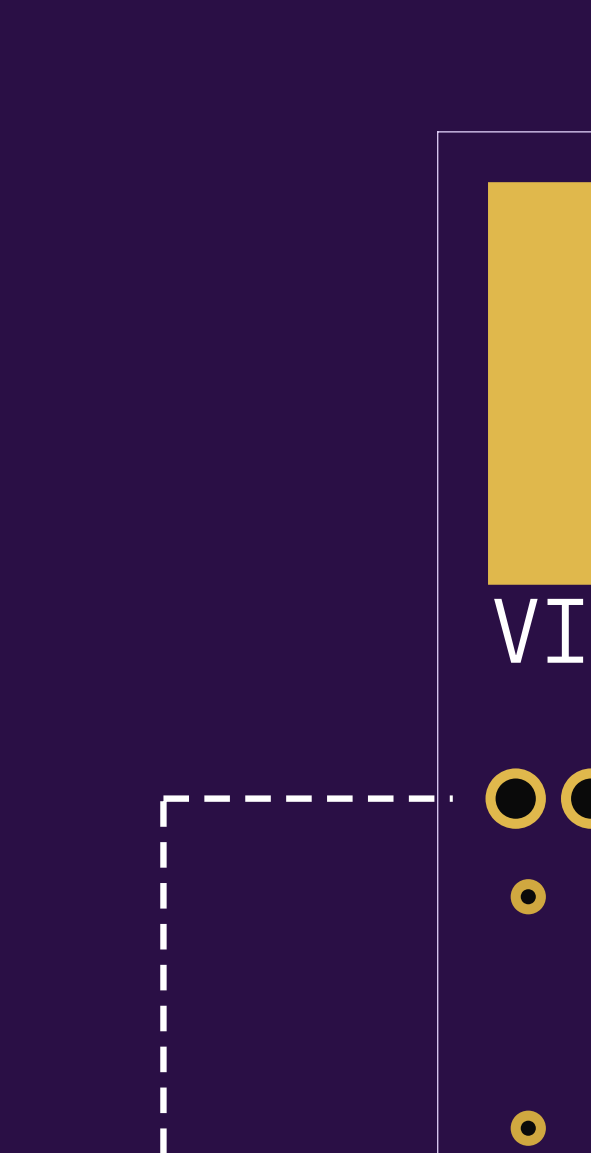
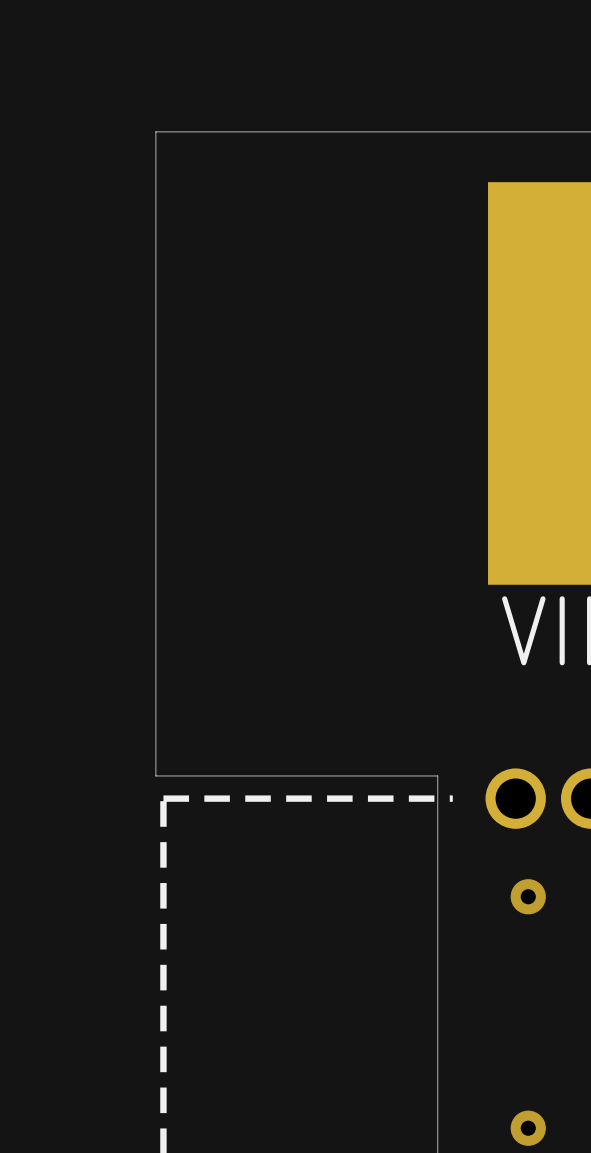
board edge: (437, 131) (437, 775) -> (437, 131) (155, 131) (155, 775) (437, 775)

